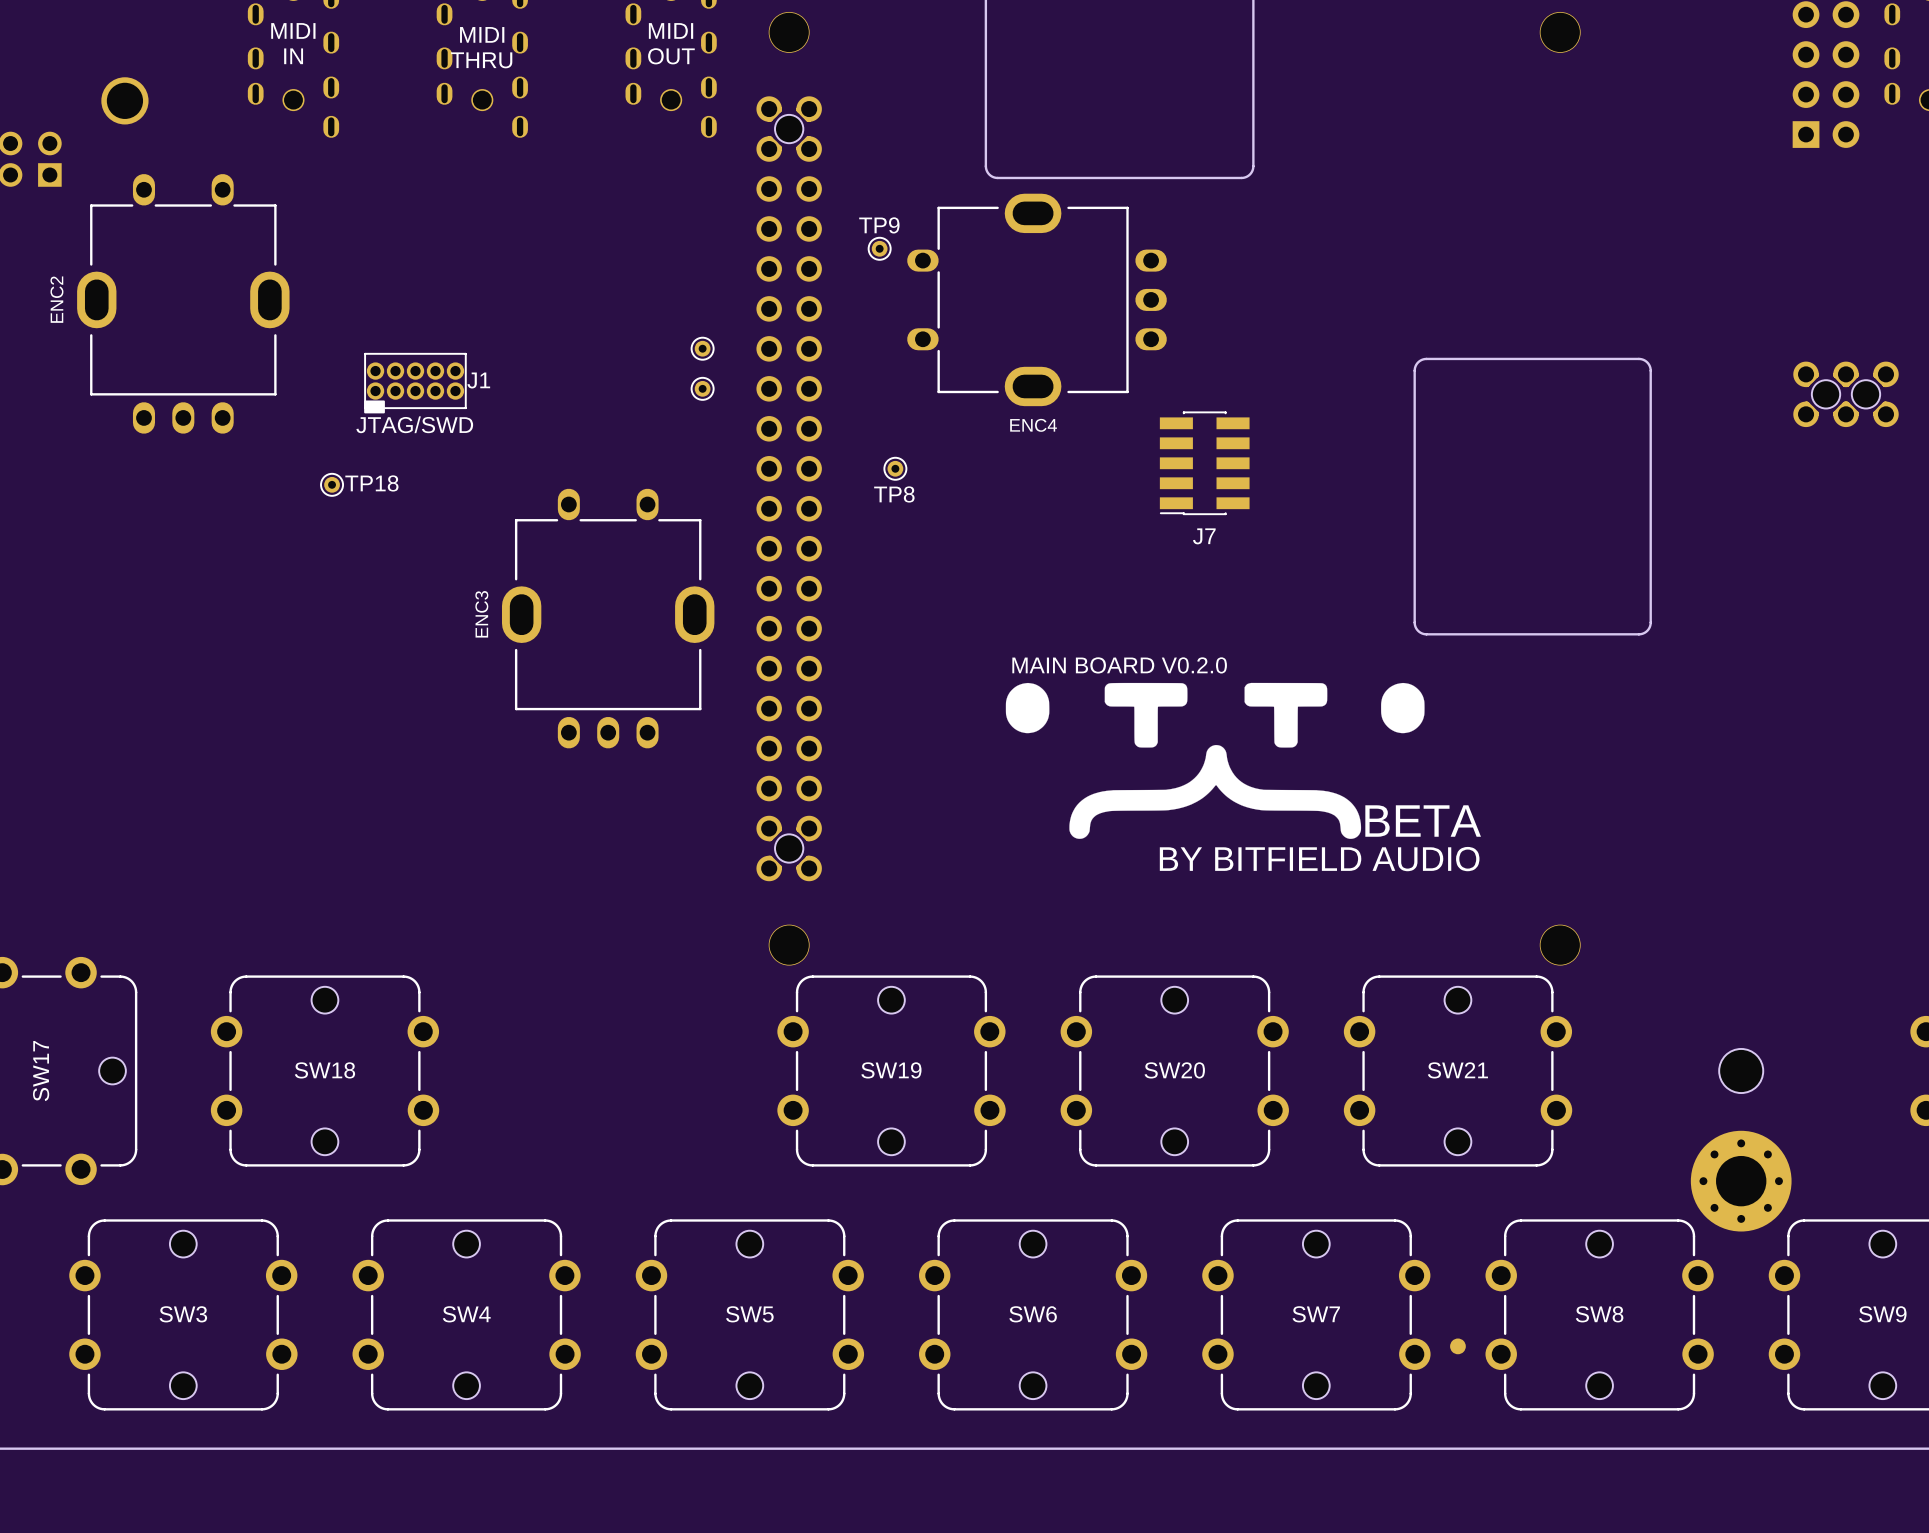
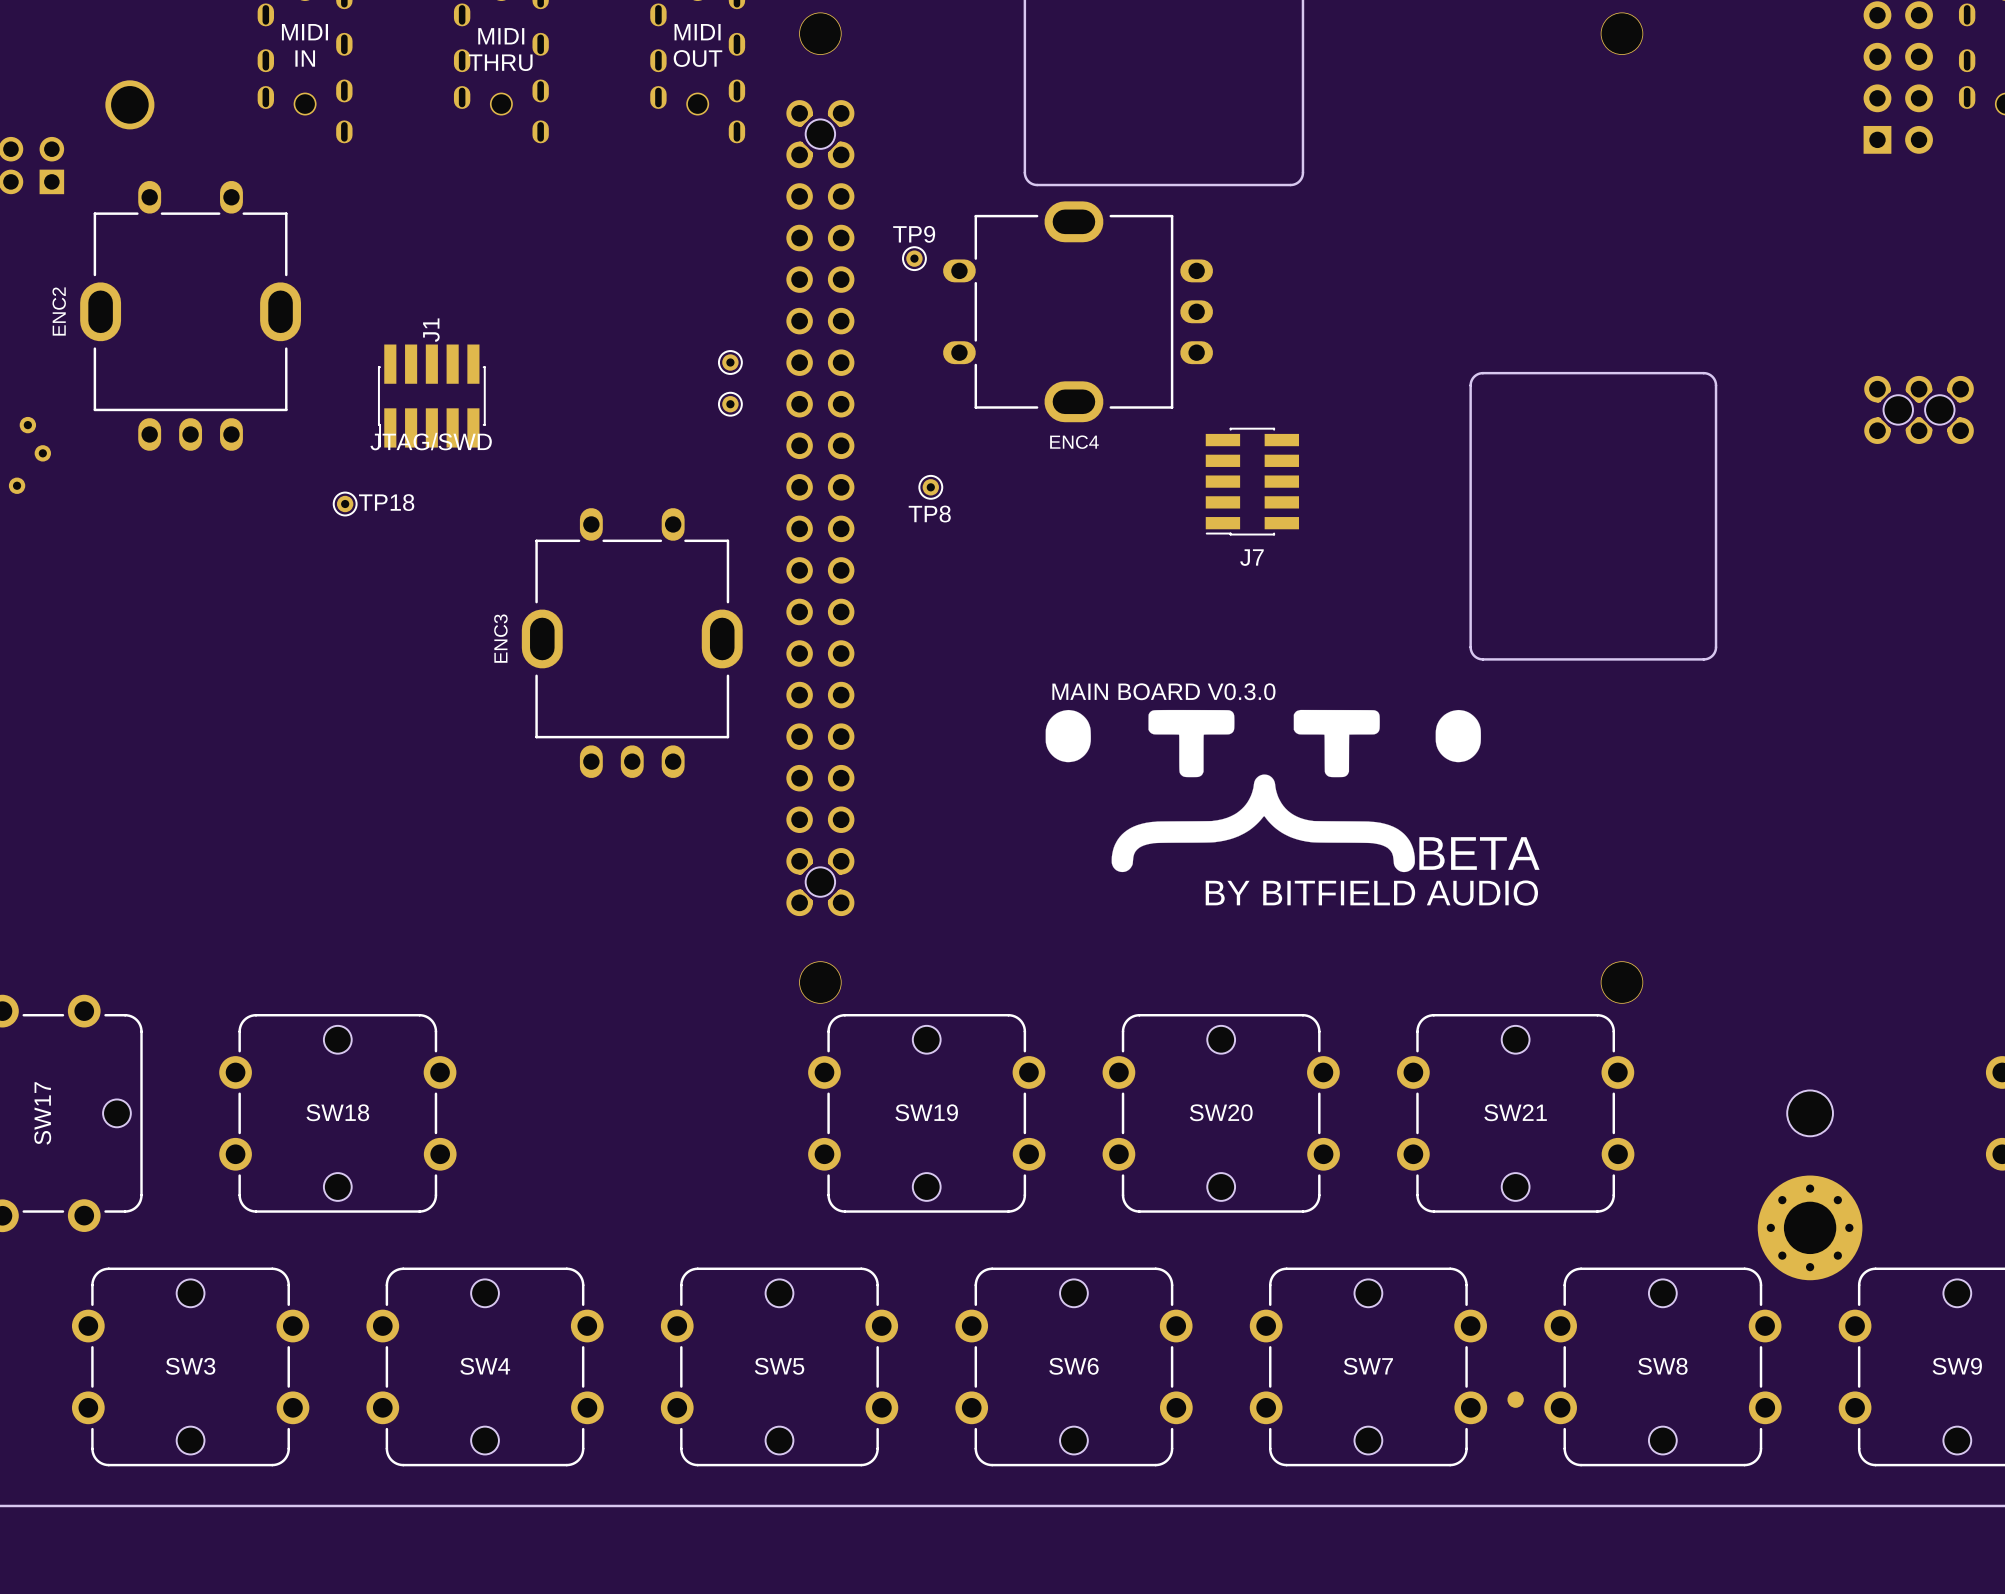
J1 footprint: [364, 352, 467, 414] -> [377, 344, 486, 448]
J1 name position: J1 (478, 380) -> J1 (431, 330)
part: none -> (27, 425)
part: none -> (42, 453)
part: none -> (17, 485)
text: MAIN BOARD V0.2.0 (1119, 665) -> MAIN BOARD V0.3.0 (1163, 691)

